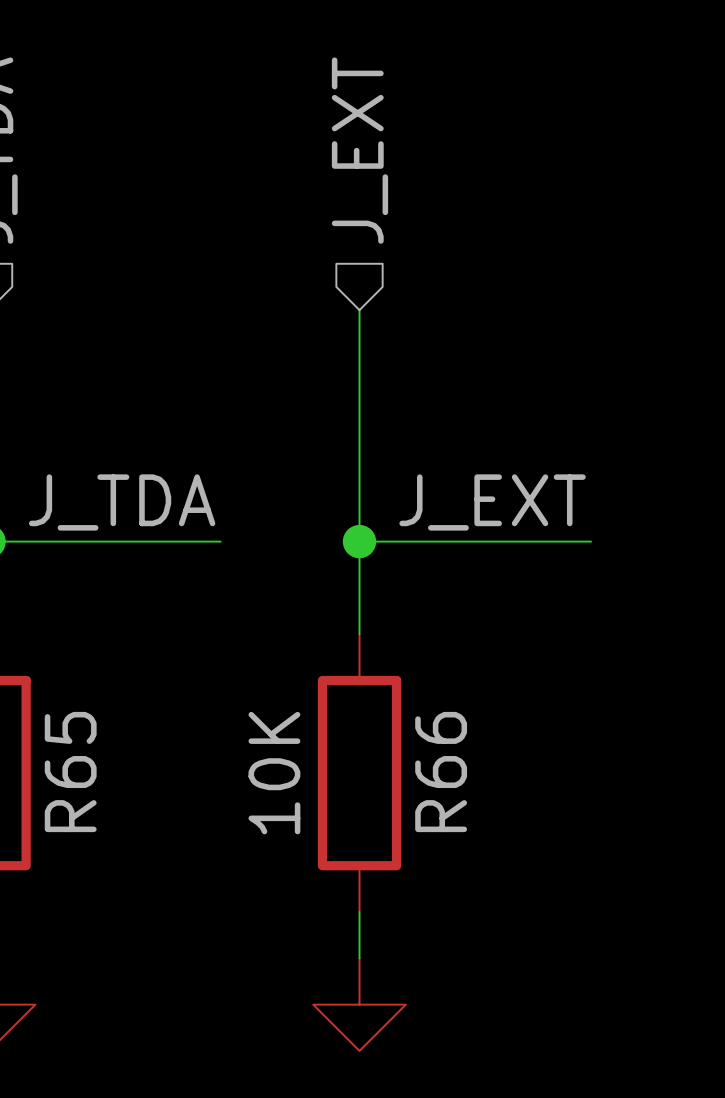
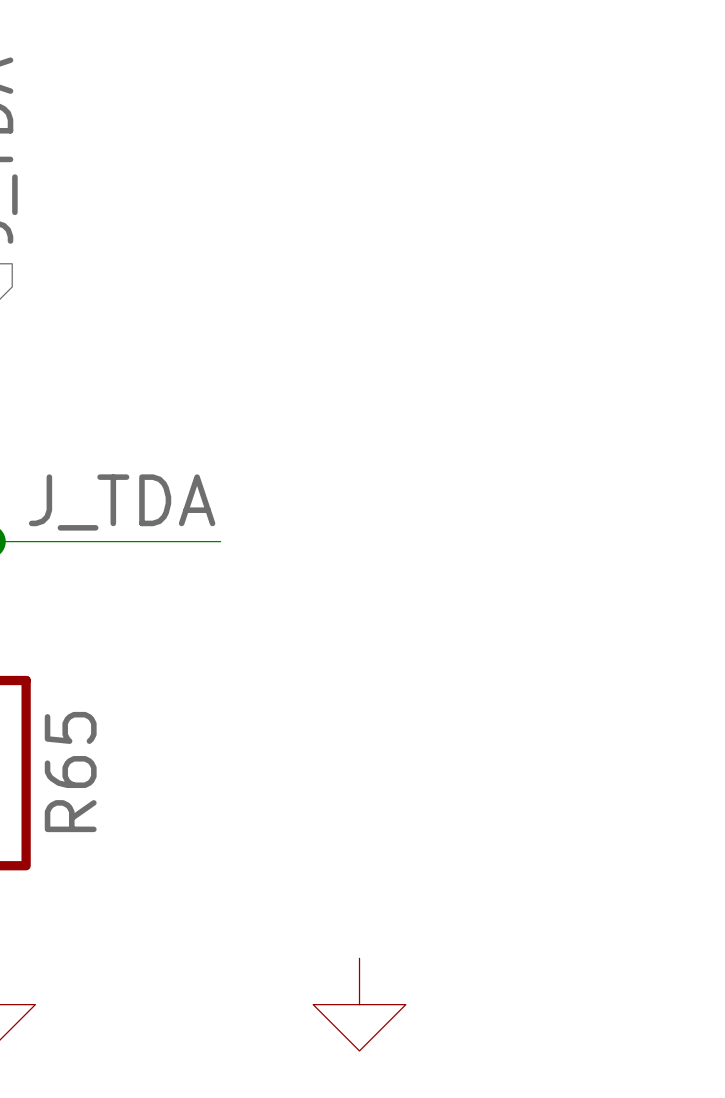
hierarchical label: J_EXT (359, 150) -> none
wire: (359, 310) (359, 634) -> none
label: J_EXT (492, 502) -> none
wire: (359, 541) (591, 541) -> none
junction: (359, 541) -> none
R66: 10K (359, 773) -> none
wire: (359, 912) (359, 958) -> none

